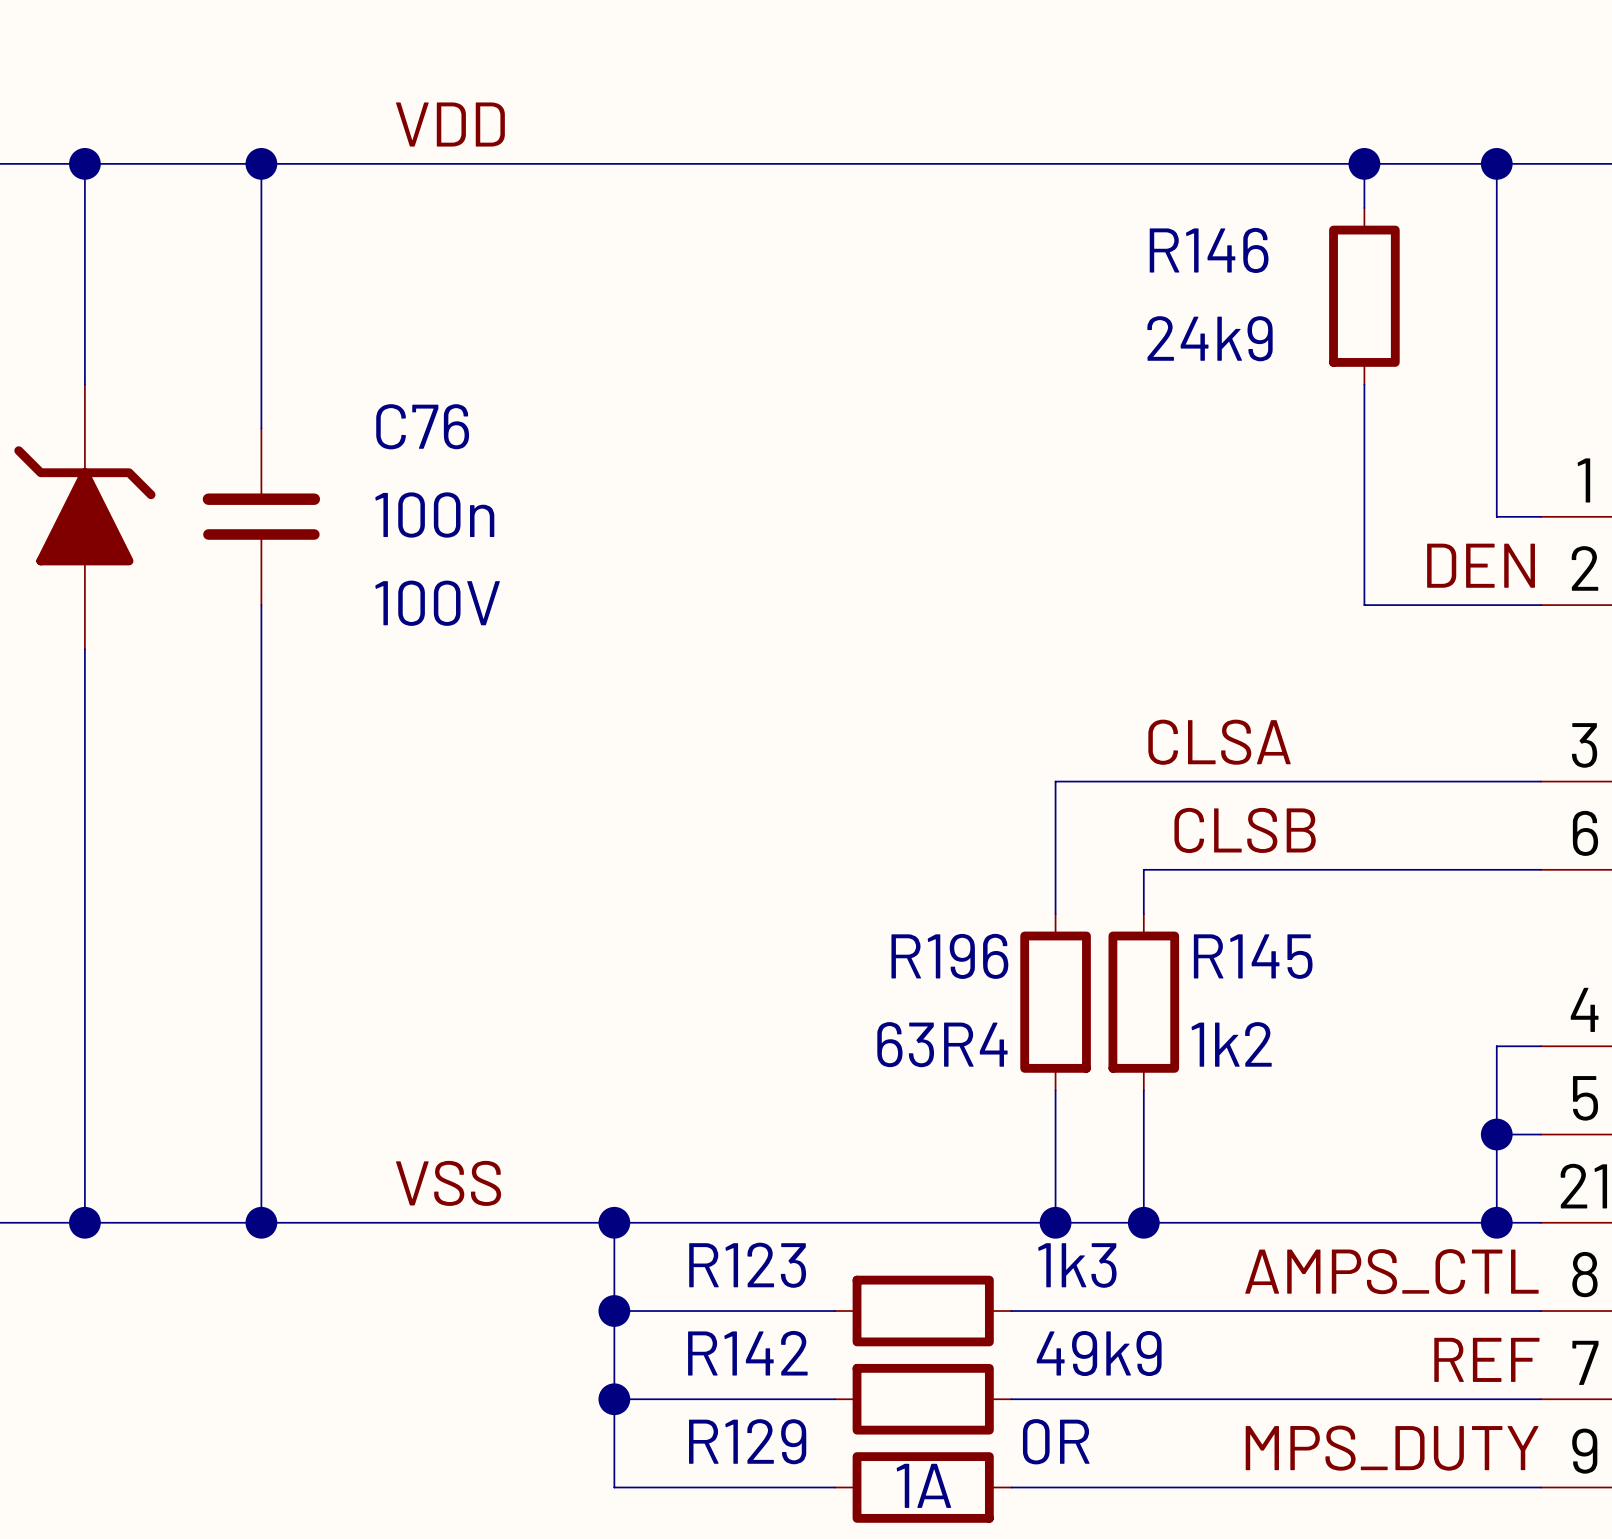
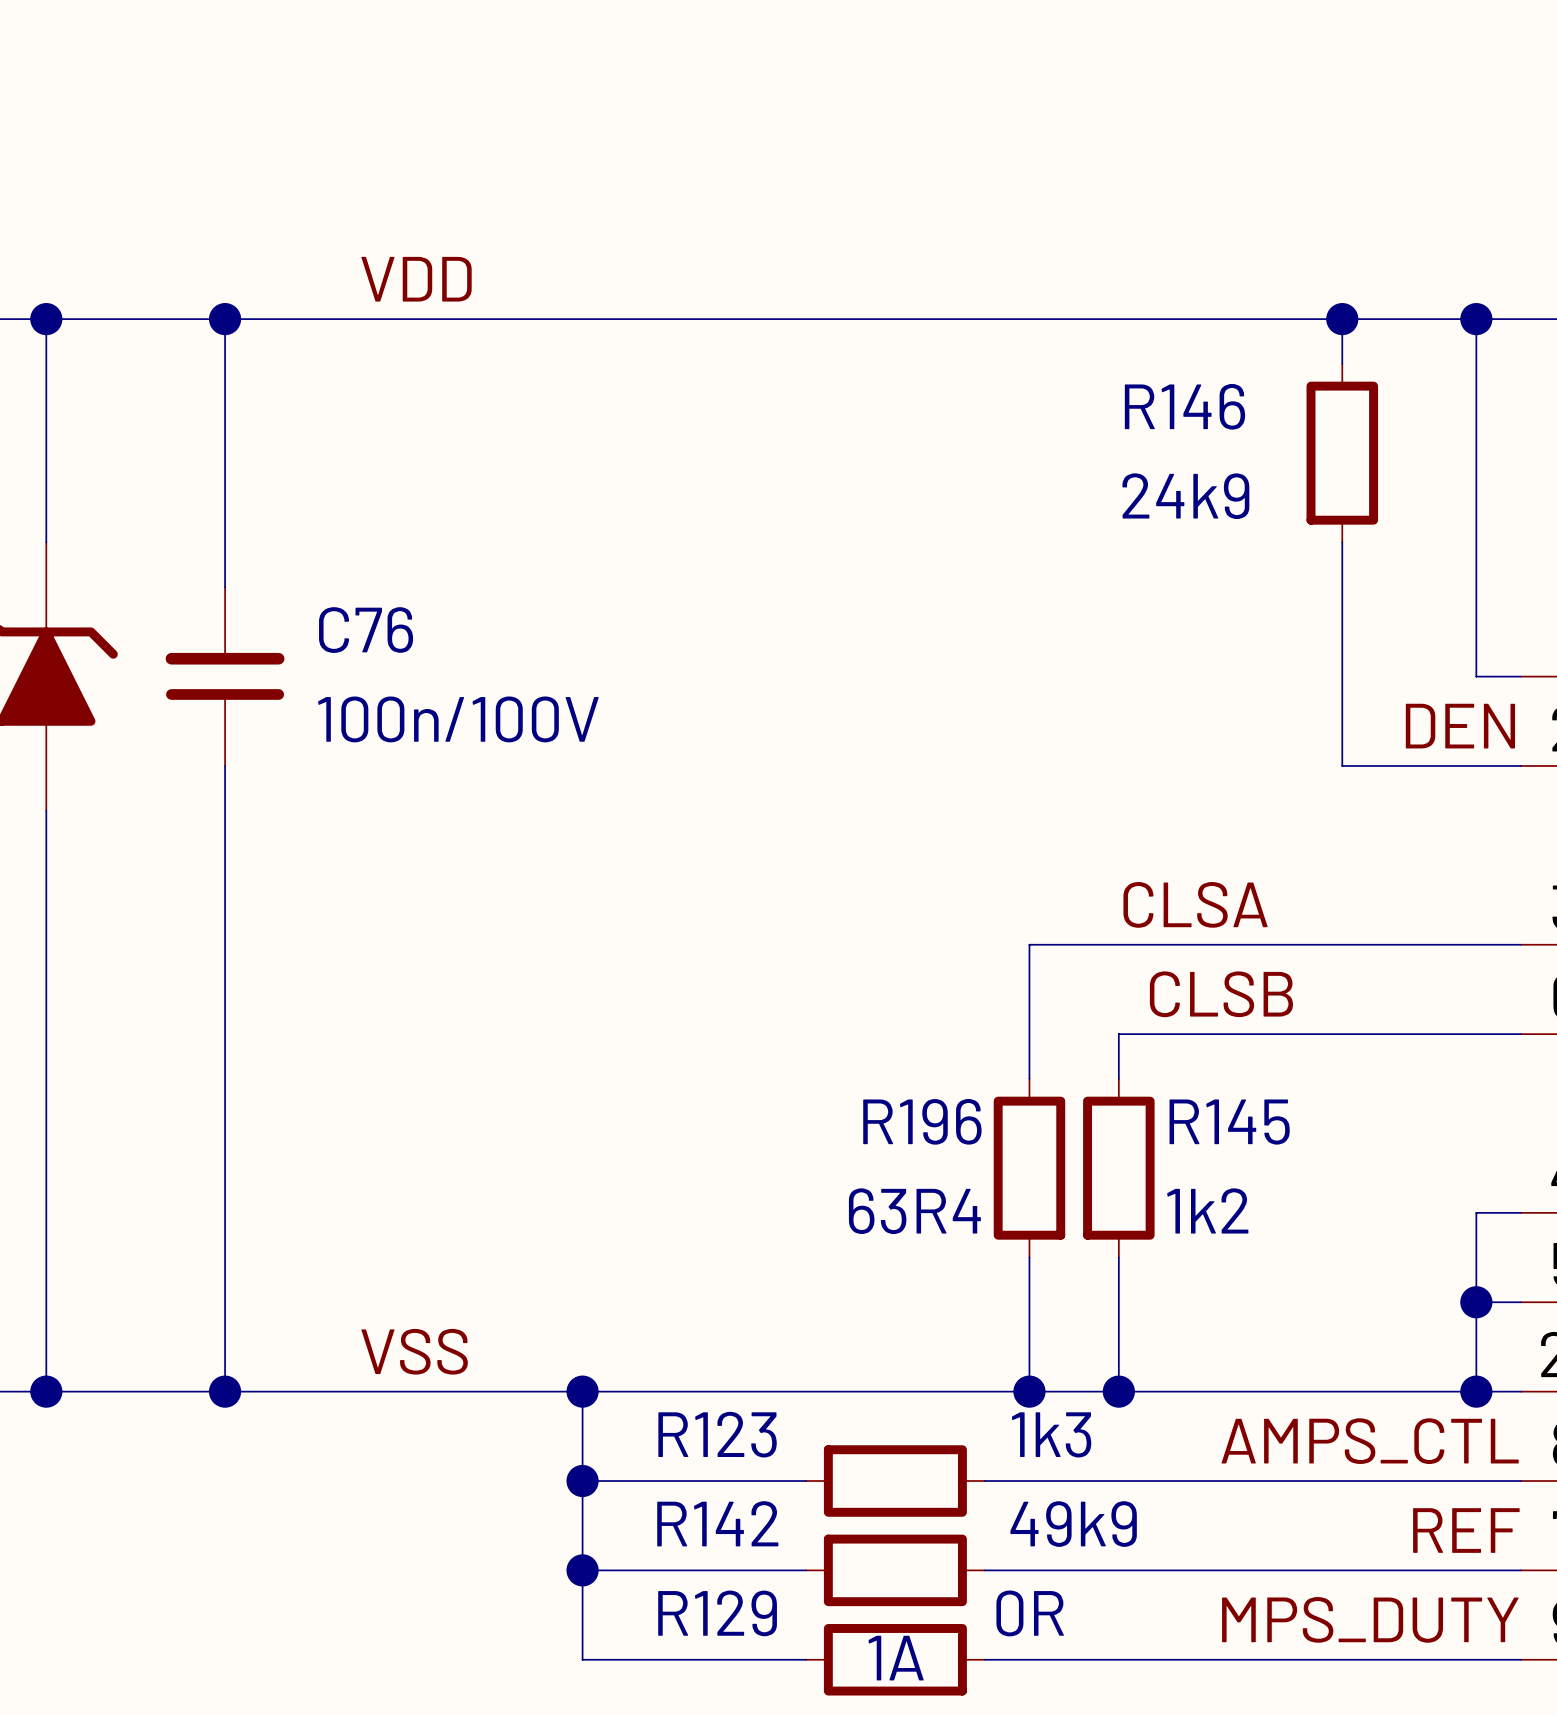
C76 name position: C76 (422, 426) -> C76 (366, 630)
C76 text: 100n (434, 515) -> 100n/100V (458, 719)
C76 text: 100V (437, 603) -> none

